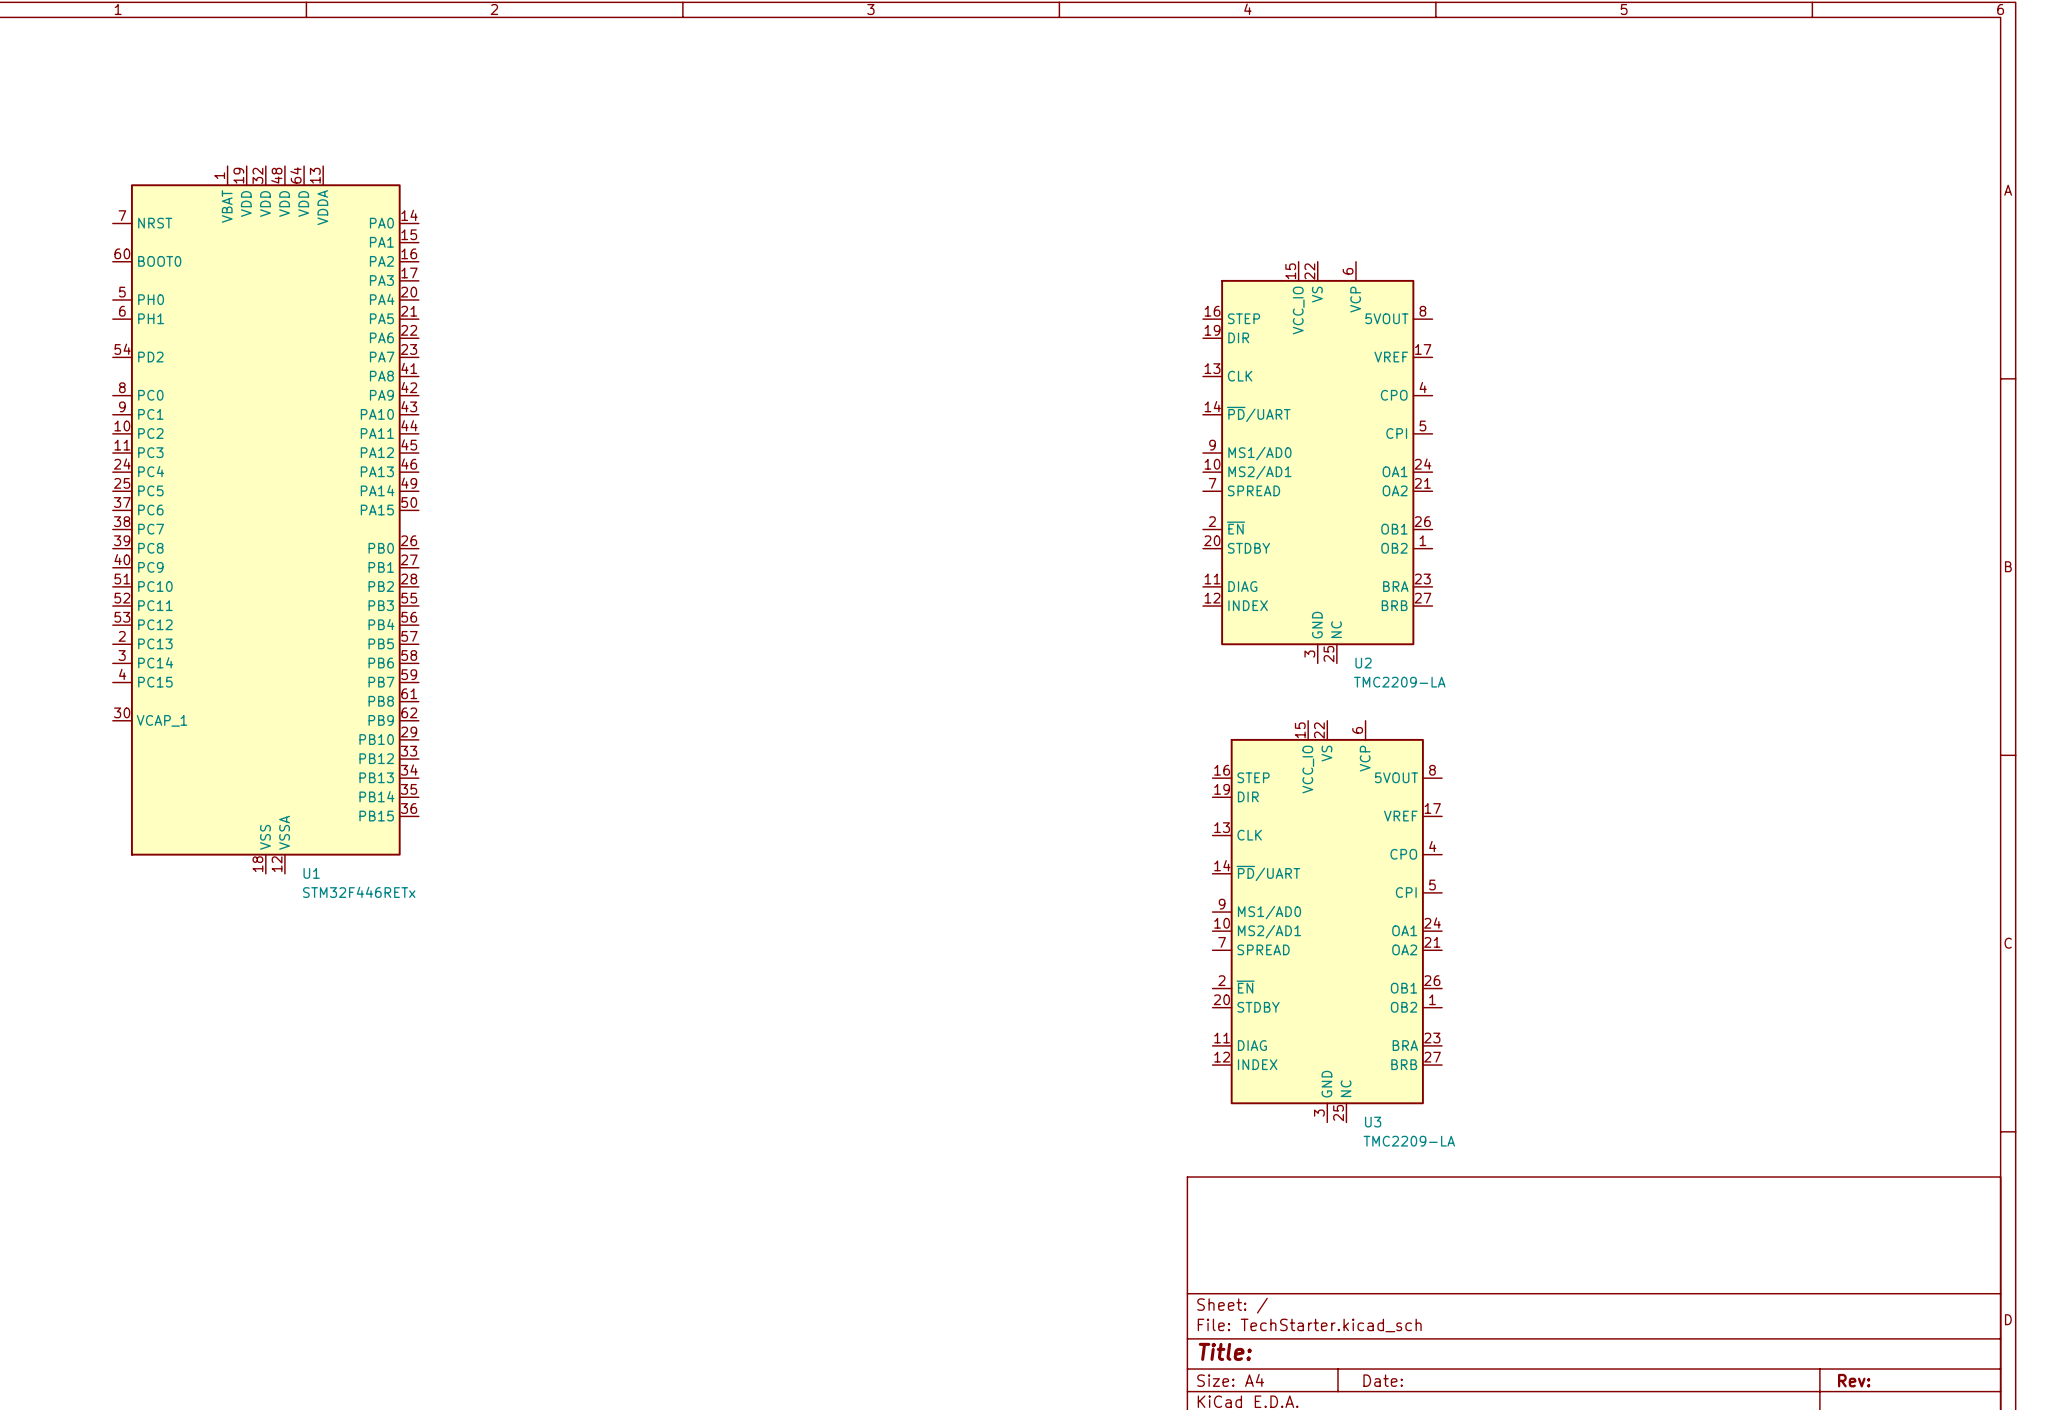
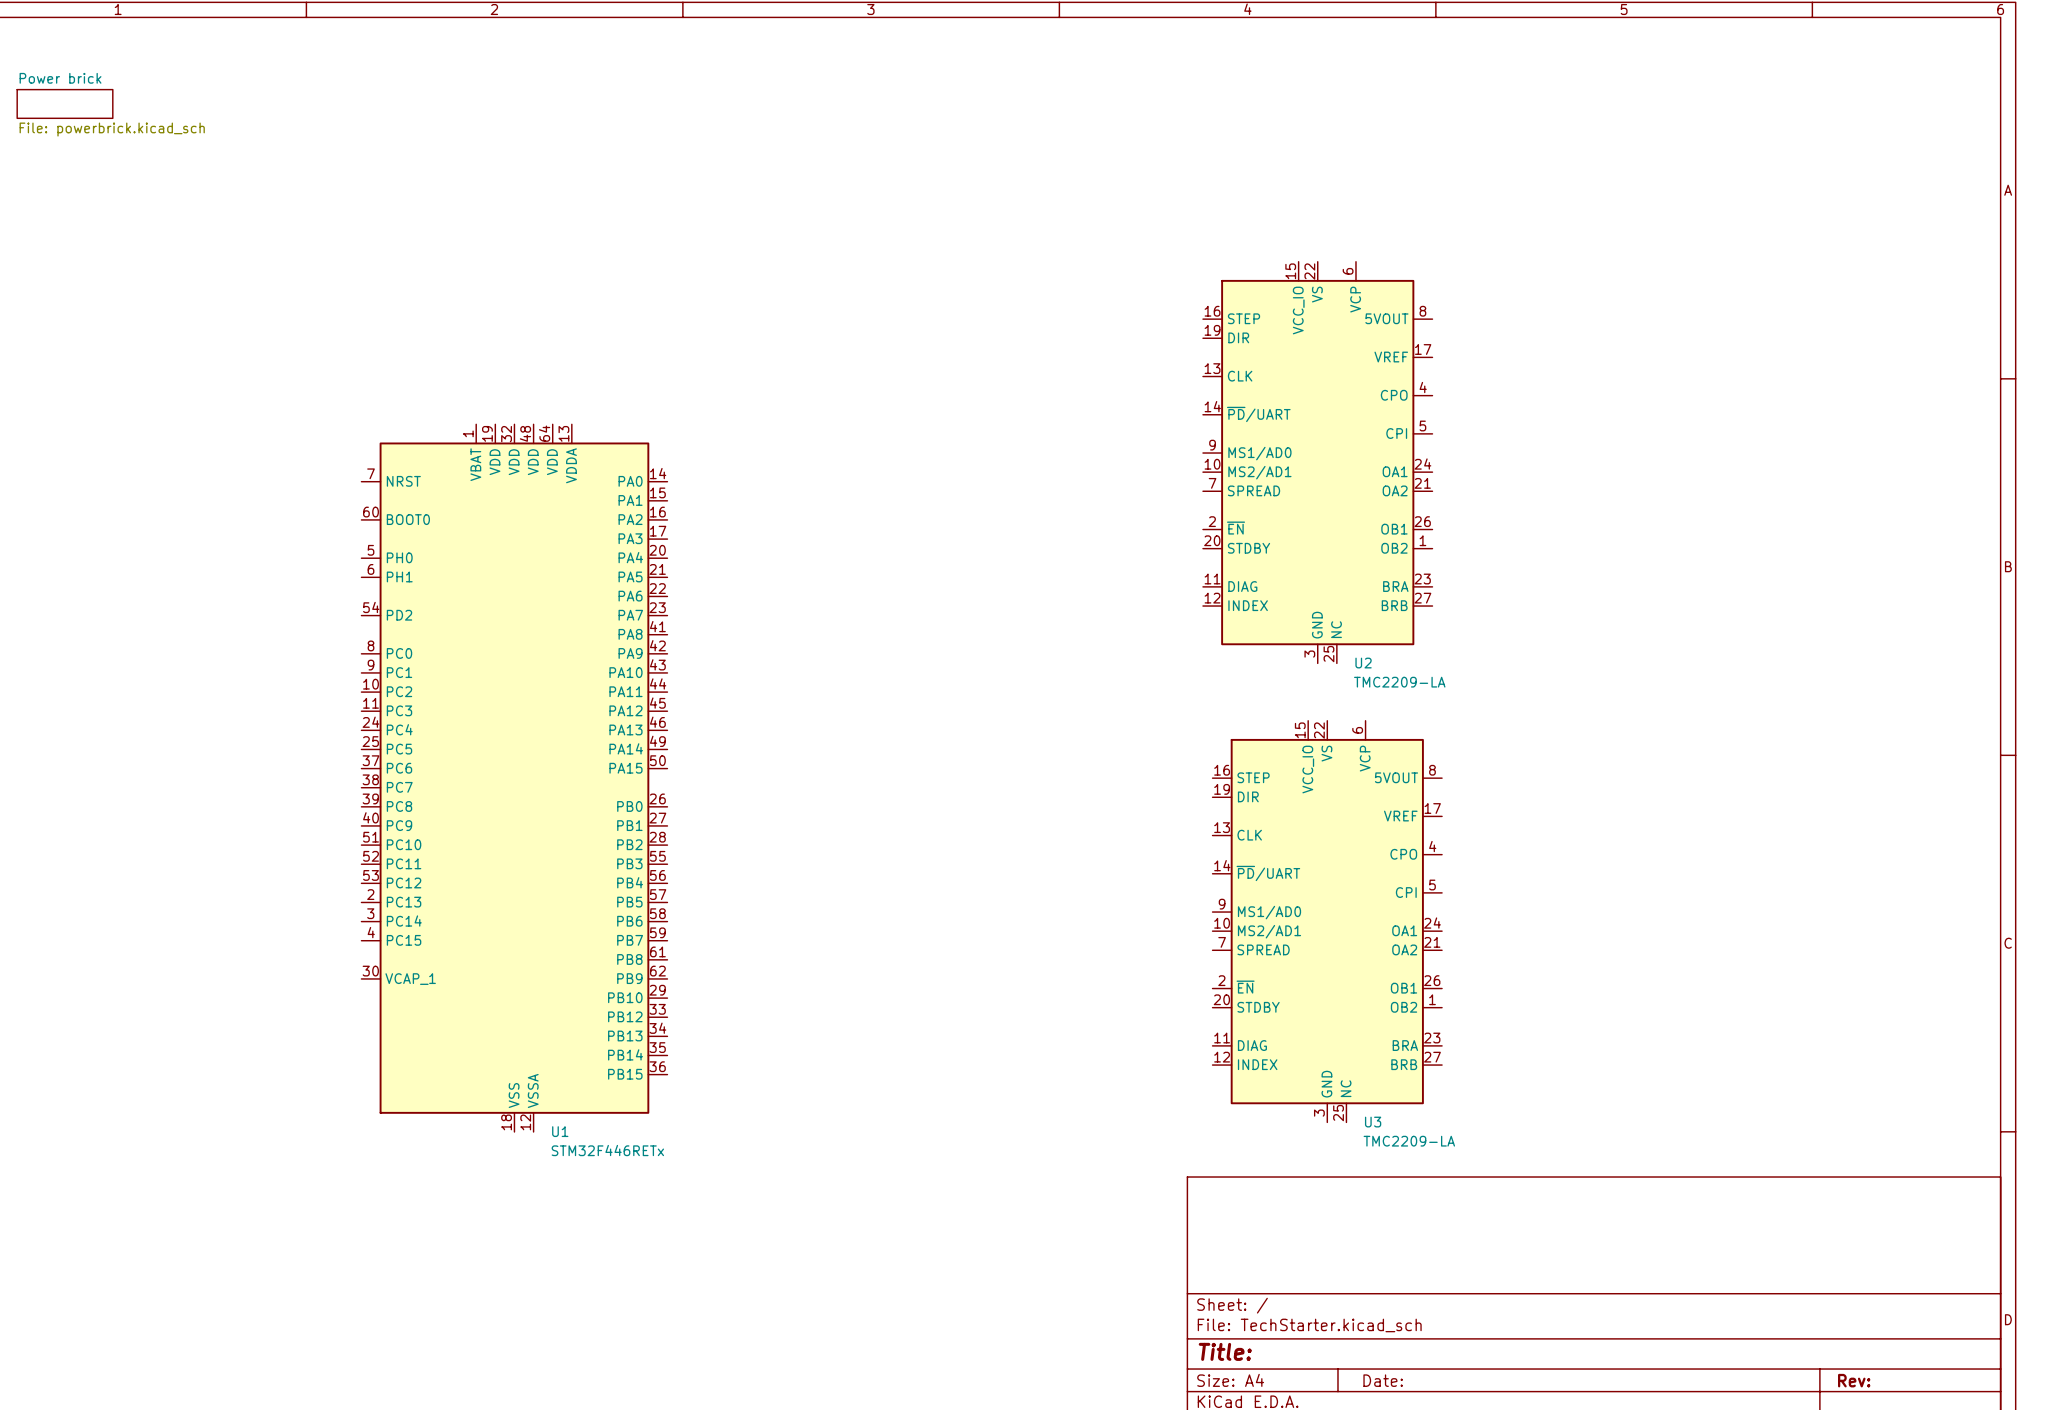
sheet Power brick: none -> File: powerbrick.kicad_sch (64, 103)
U1 position: (265, 519) -> (514, 778)

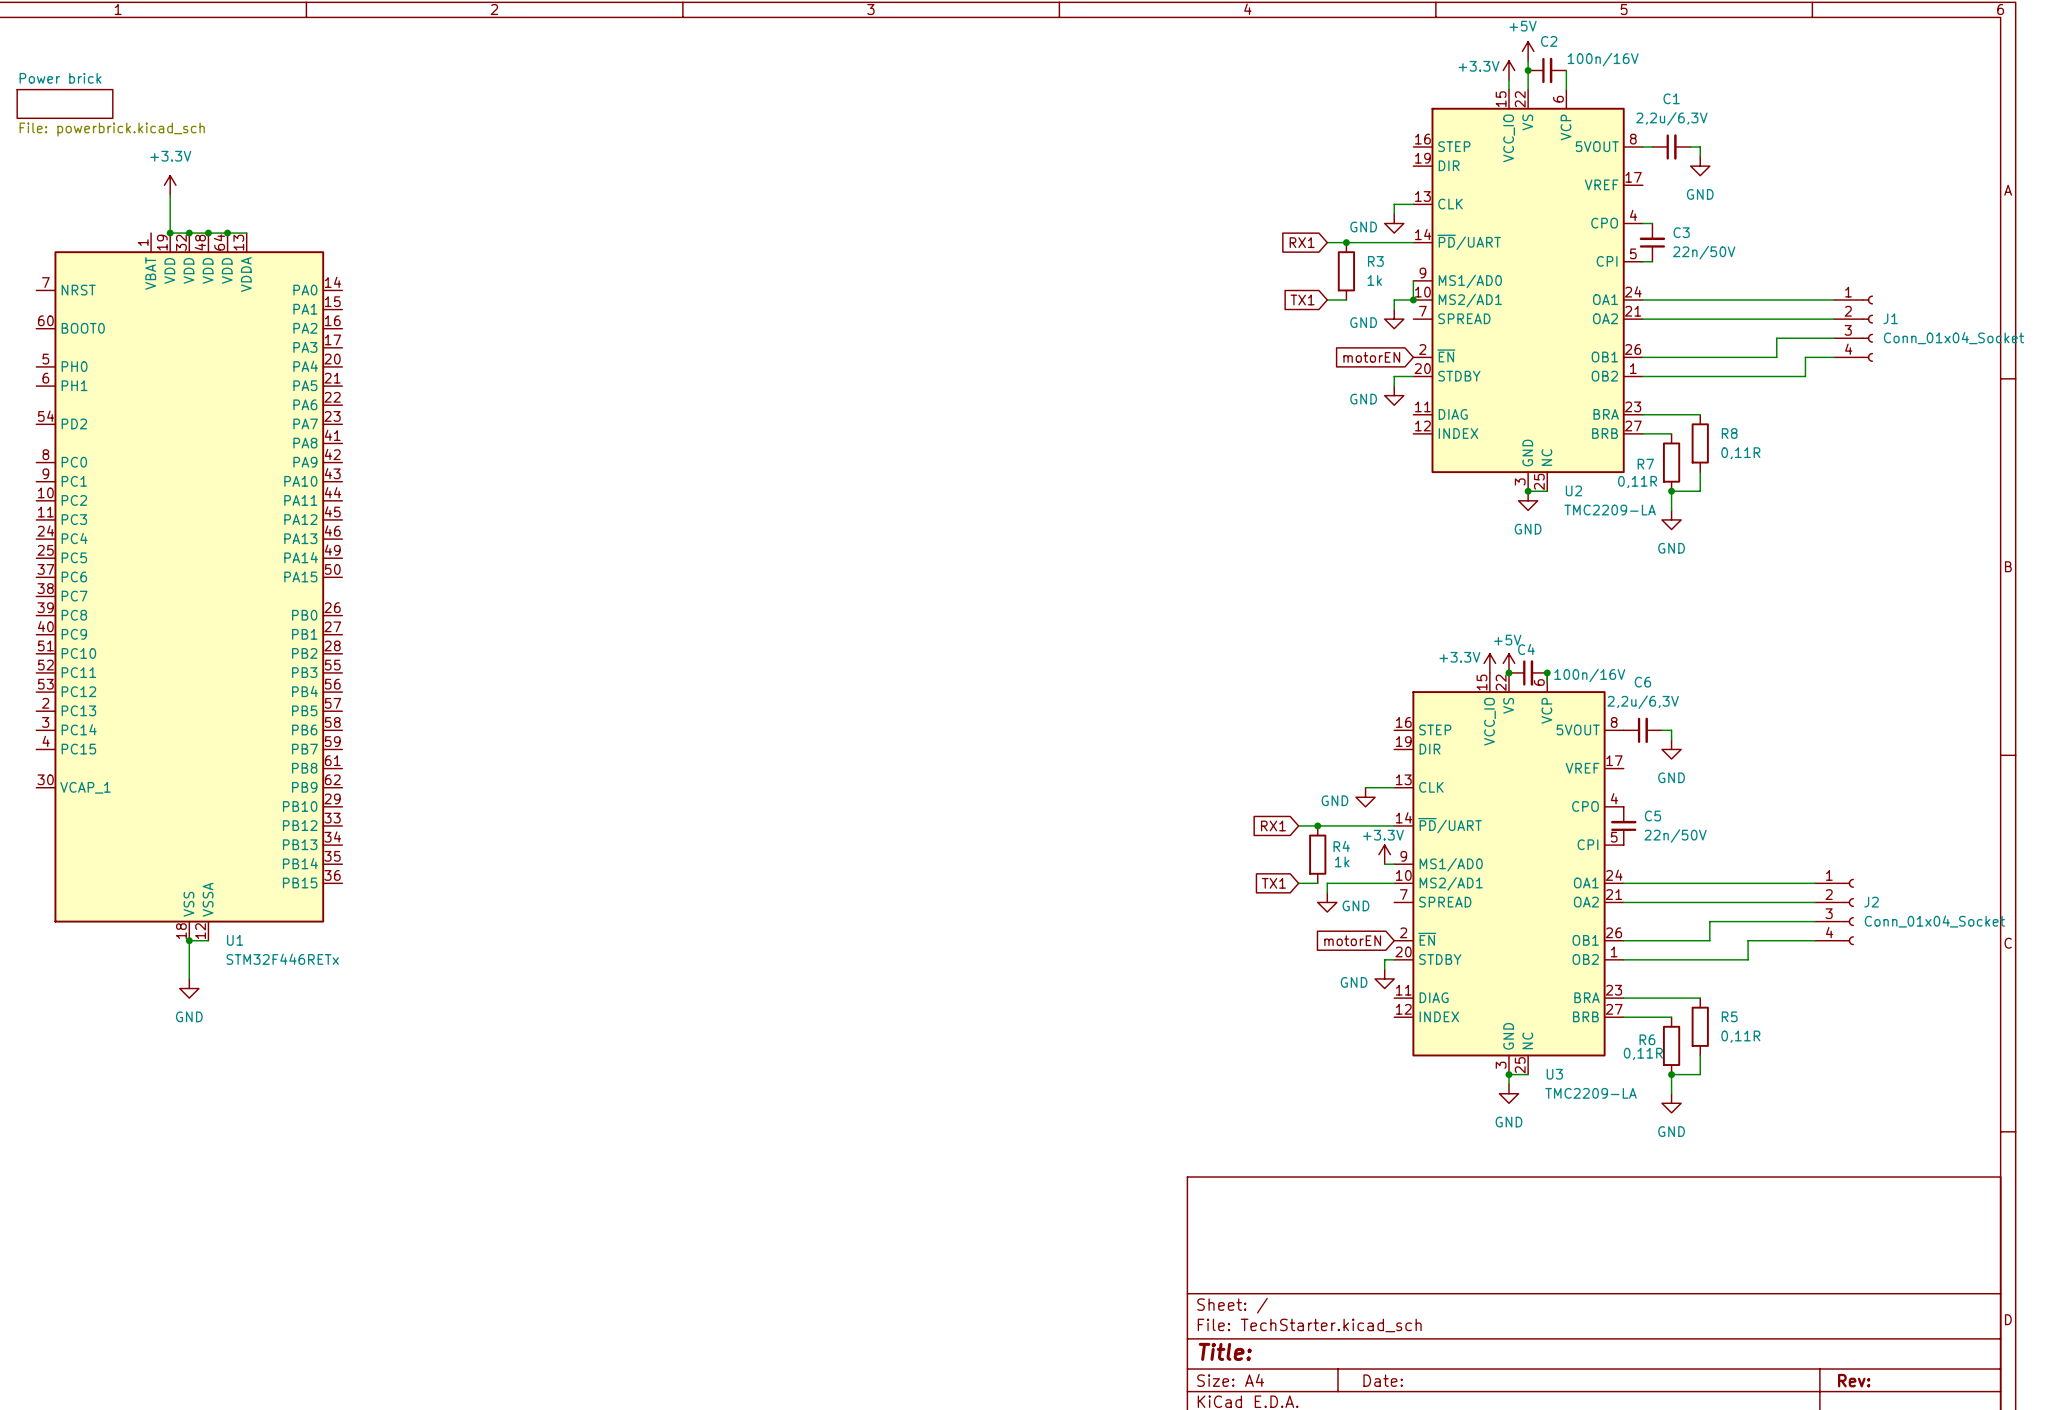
power symbol: none -> +5V (1528, 51)
wire: none -> (1528, 60) (1528, 89)
power symbol: none -> +3.3V (1508, 70)
junction: none -> (1528, 70)
C2: none -> 100n/16V (1547, 70)
wire: none -> (1566, 70) (1566, 89)
wire: none -> (1508, 80) (1508, 89)
wire: none -> (1642, 146) (1652, 146)
C1: none -> 2,2u/6,3V (1671, 146)
wire: none -> (1690, 146) (1700, 146) (1700, 156)
power symbol: none -> GND (1700, 166)
power symbol: none -> +3.3V (170, 185)
wire: none -> (170, 194) (170, 233) (246, 233)
wire: none -> (1413, 204) (1394, 204) (1394, 213)
power symbol: none -> GND (1394, 223)
wire: none -> (1642, 223) (1652, 223)
junction: none -> (170, 233)
junction: none -> (189, 233)
junction: none -> (208, 233)
junction: none -> (227, 233)
global label: none -> RX1 (1302, 242)
wire: none -> (1327, 242) (1413, 242)
junction: none -> (1346, 242)
C3: none -> 22n/50V (1652, 242)
wire: none -> (1642, 261) (1652, 261)
R3: none -> 1k (1346, 271)
global label: none -> TX1 (1302, 300)
junction: none -> (1413, 300)
wire: none -> (1642, 300) (1834, 300)
power symbol: none -> GND (1394, 319)
wire: none -> (1642, 319) (1834, 319)
J1: none -> Conn_01x04_Socket (1853, 328)
wire: none -> (1834, 338) (1776, 338) (1776, 357) (1642, 357)
global label: none -> motorEN (1371, 357)
wire: none -> (1834, 357) (1805, 357) (1805, 376) (1642, 376)
power symbol: none -> GND (1394, 395)
wire: none -> (1642, 414) (1700, 414)
wire: none -> (1642, 433) (1671, 433)
R8: none -> 0,11R (1700, 443)
U2 position: (1317, 462) -> (1528, 290)
R7: none -> 0,11R (1671, 462)
wire: none -> (1700, 472) (1700, 491) (1671, 491) (1671, 510)
wire: none -> (1528, 491) (1547, 491)
junction: none -> (1528, 491)
junction: none -> (1671, 491)
power symbol: none -> GND (1528, 500)
power symbol: none -> GND (1671, 519)
power symbol: none -> +3.3V (1489, 663)
power symbol: none -> +5V (1508, 663)
junction: none -> (1508, 672)
C4: none -> 100n/16V (1528, 672)
wire: none -> (1547, 672) (1547, 682)
junction: none -> (1547, 672)
C6: none -> 2,2u/6,3V (1642, 730)
wire: none -> (1662, 730) (1671, 730) (1671, 739)
power symbol: none -> GND (1671, 749)
U1 position: (514, 778) -> (189, 586)
power symbol: none -> GND (1365, 797)
global label: none -> RX1 (1273, 825)
junction: none -> (1317, 825)
C5: none -> 22n/50V (1623, 825)
R4: none -> 1k (1317, 854)
power symbol: none -> +3.3V (1384, 854)
global label: none -> TX1 (1273, 883)
wire: none -> (1623, 883) (1815, 883)
power symbol: none -> GND (1327, 902)
wire: none -> (1623, 902) (1815, 902)
J2: none -> Conn_01x04_Socket (1834, 912)
U3 position: (1327, 921) -> (1508, 873)
wire: none -> (1815, 921) (1709, 921) (1709, 940) (1623, 940)
junction: none -> (189, 940)
wire: none -> (208, 940) (189, 940) (189, 978)
global label: none -> motorEN (1352, 940)
wire: none -> (1815, 940) (1748, 940) (1748, 959) (1623, 959)
power symbol: none -> GND (1384, 978)
power symbol: none -> GND (189, 988)
wire: none -> (1623, 998) (1700, 998)
wire: none -> (1623, 1017) (1671, 1017)
R5: none -> 0,11R (1700, 1026)
R6: none -> 0,11R (1671, 1045)
wire: none -> (1700, 1055) (1700, 1074) (1671, 1074) (1671, 1093)
junction: none -> (1508, 1074)
wire: none -> (1528, 1074) (1508, 1074) (1508, 1084)
junction: none -> (1671, 1074)
power symbol: none -> GND (1508, 1093)
power symbol: none -> GND (1671, 1103)

